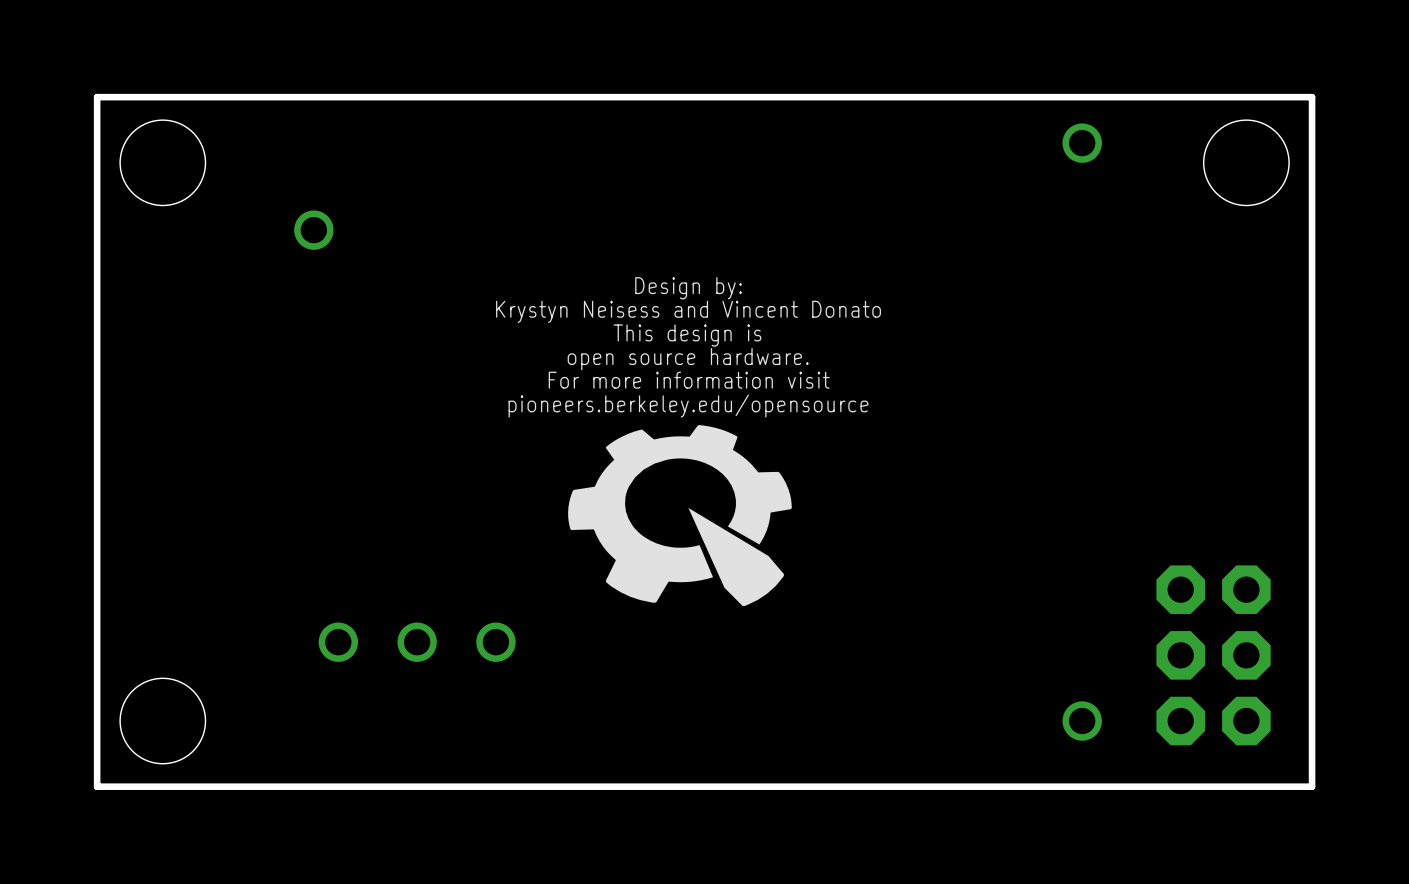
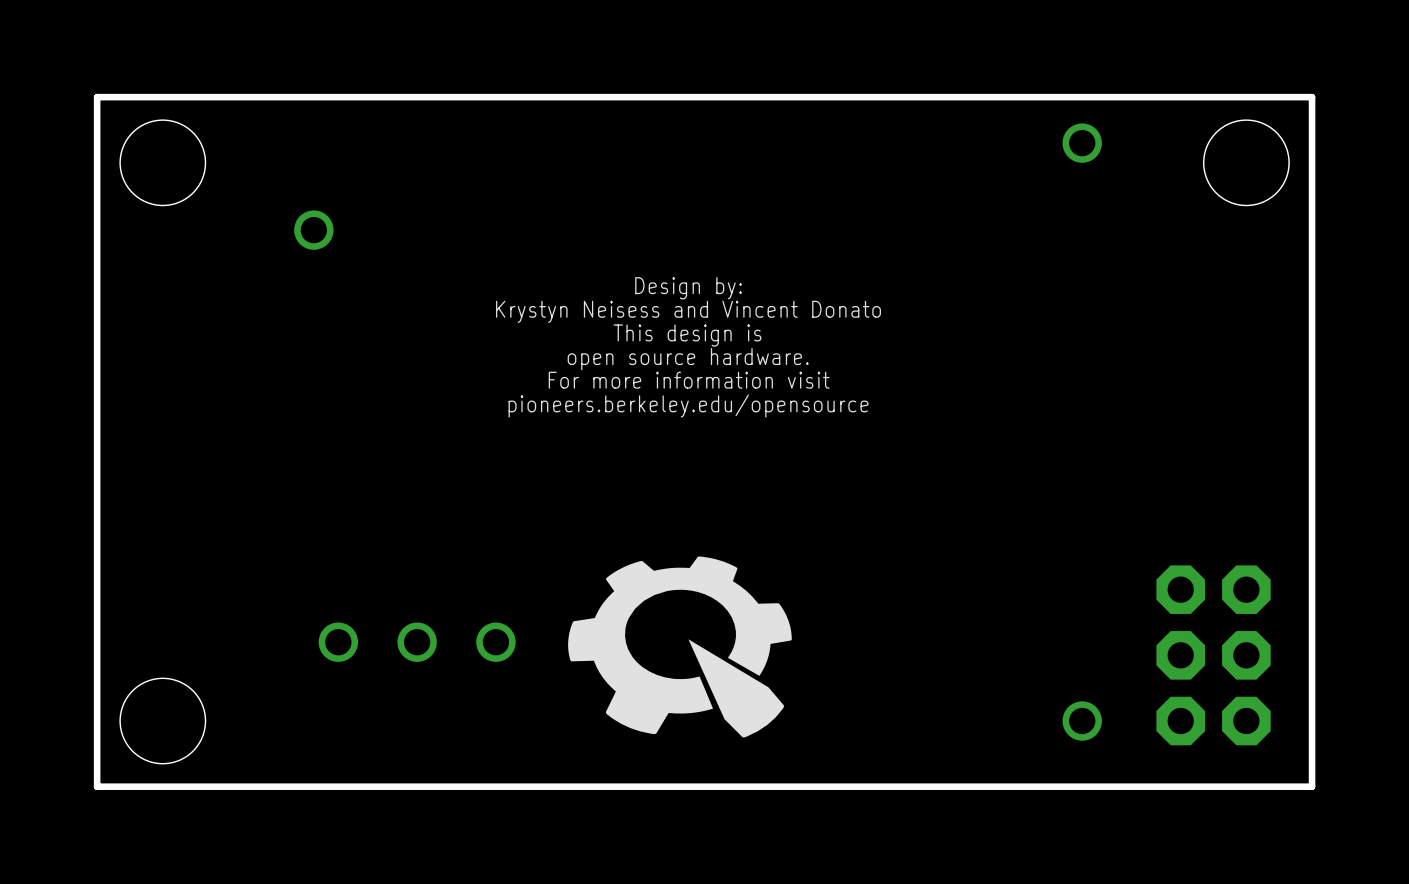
drawing position: (679, 515) -> (679, 646)

